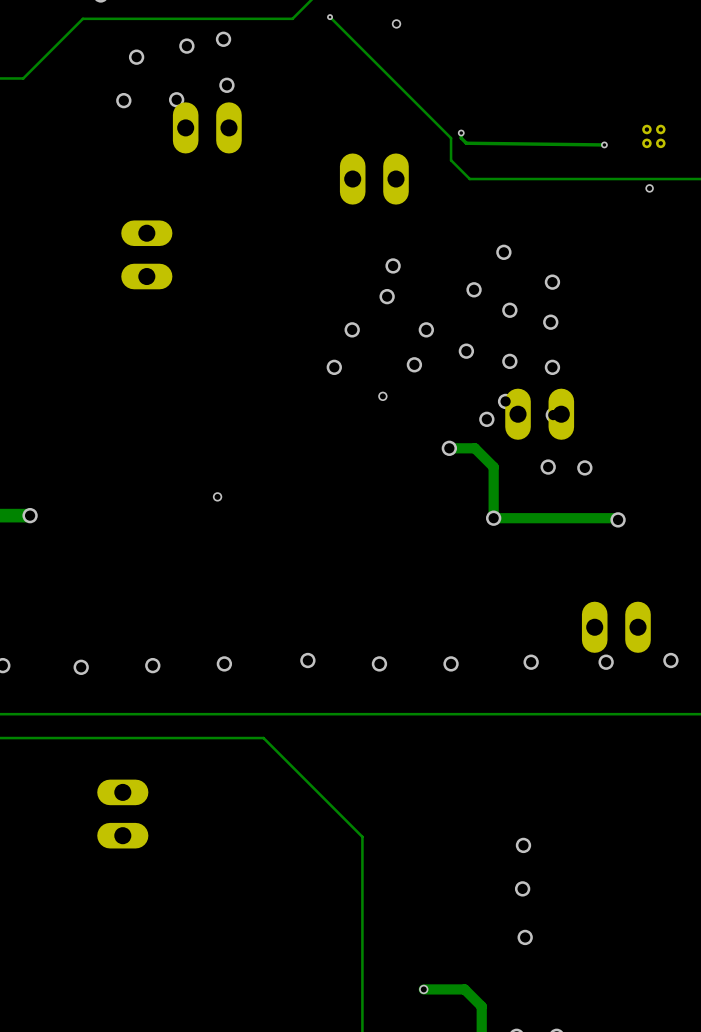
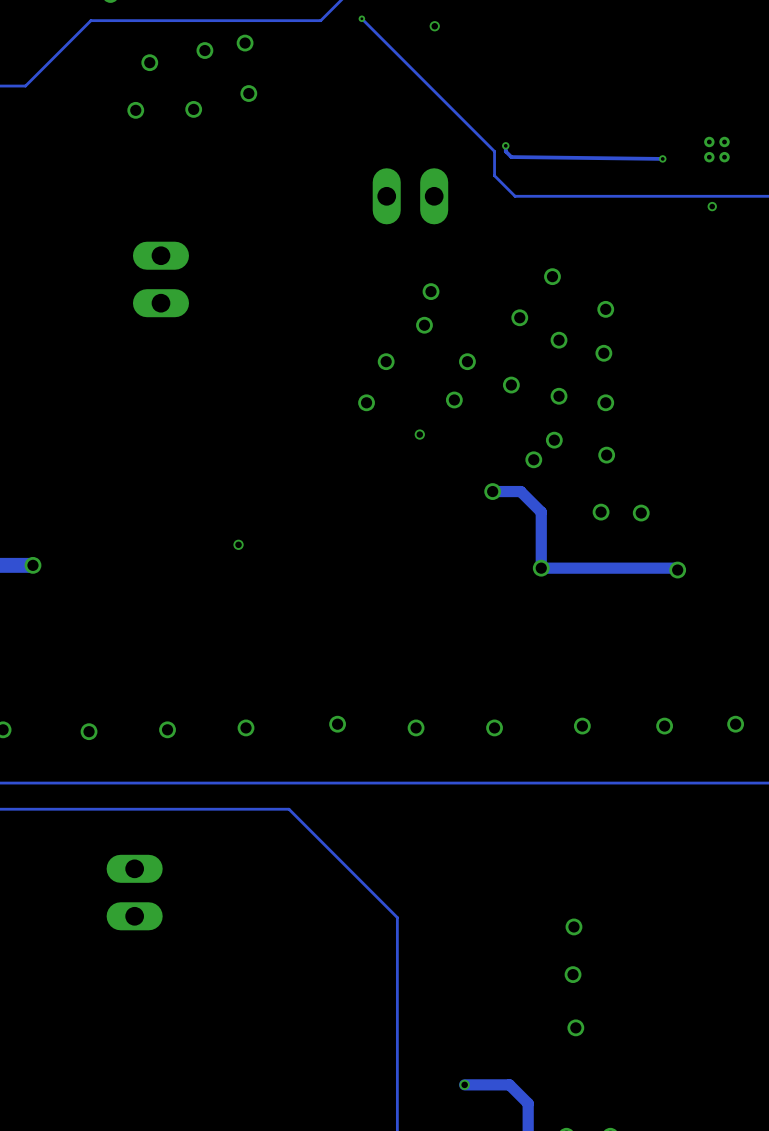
part: (207, 127) -> none
part: (539, 414) -> none
part: (616, 627) -> none

